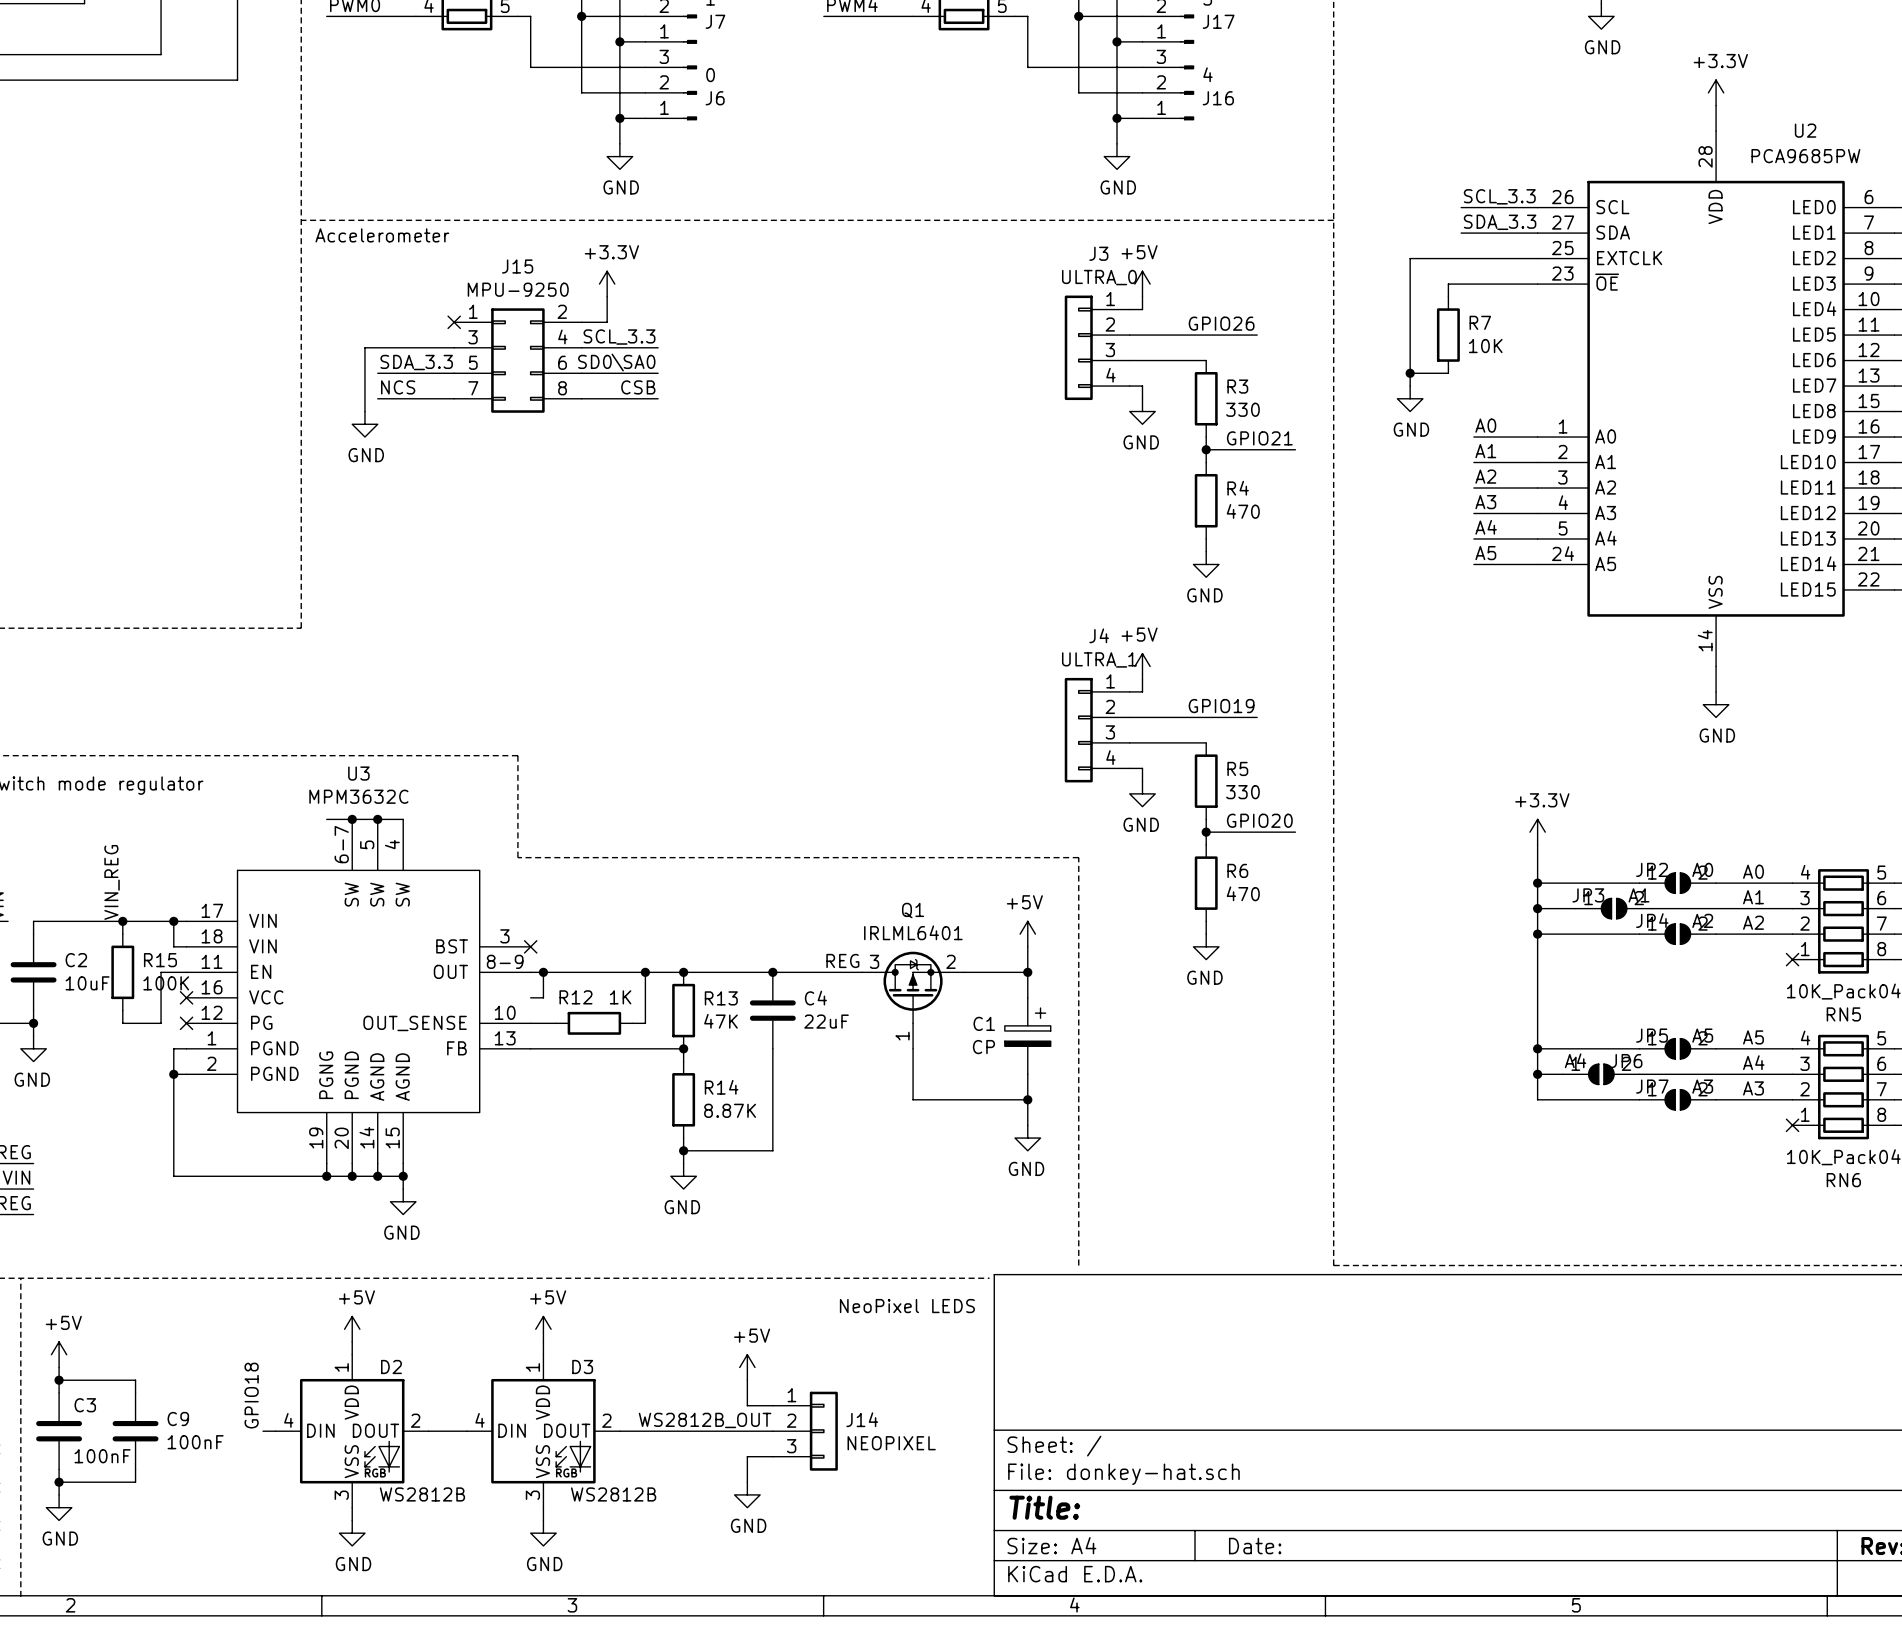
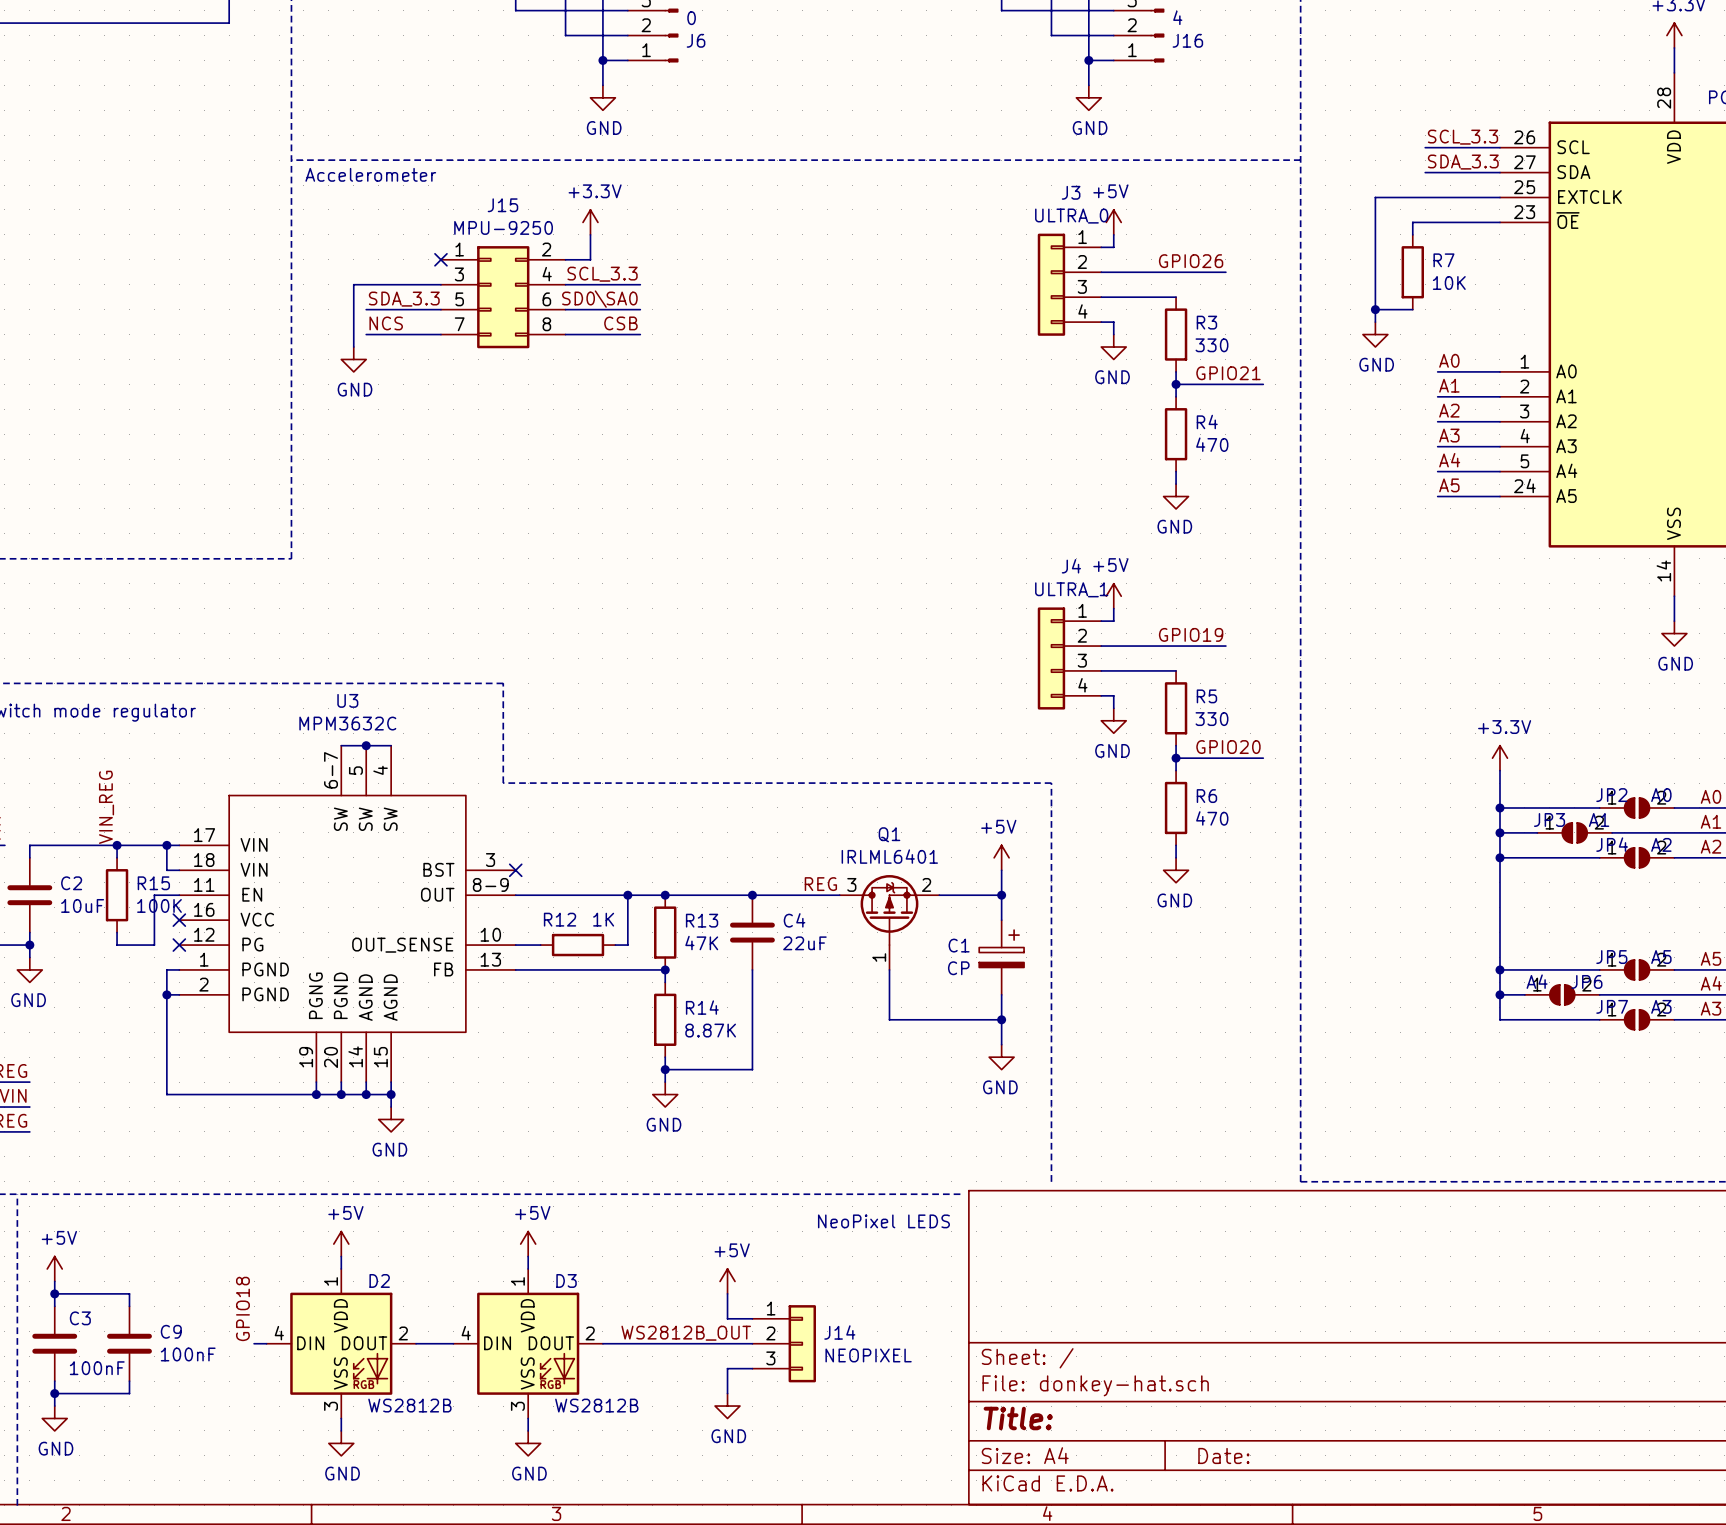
wire: (326, 819) (352, 819) -> none
junction: (352, 819) -> none
wire: (543, 972) (543, 997) (530, 997) -> none
junction: (543, 972) -> none

